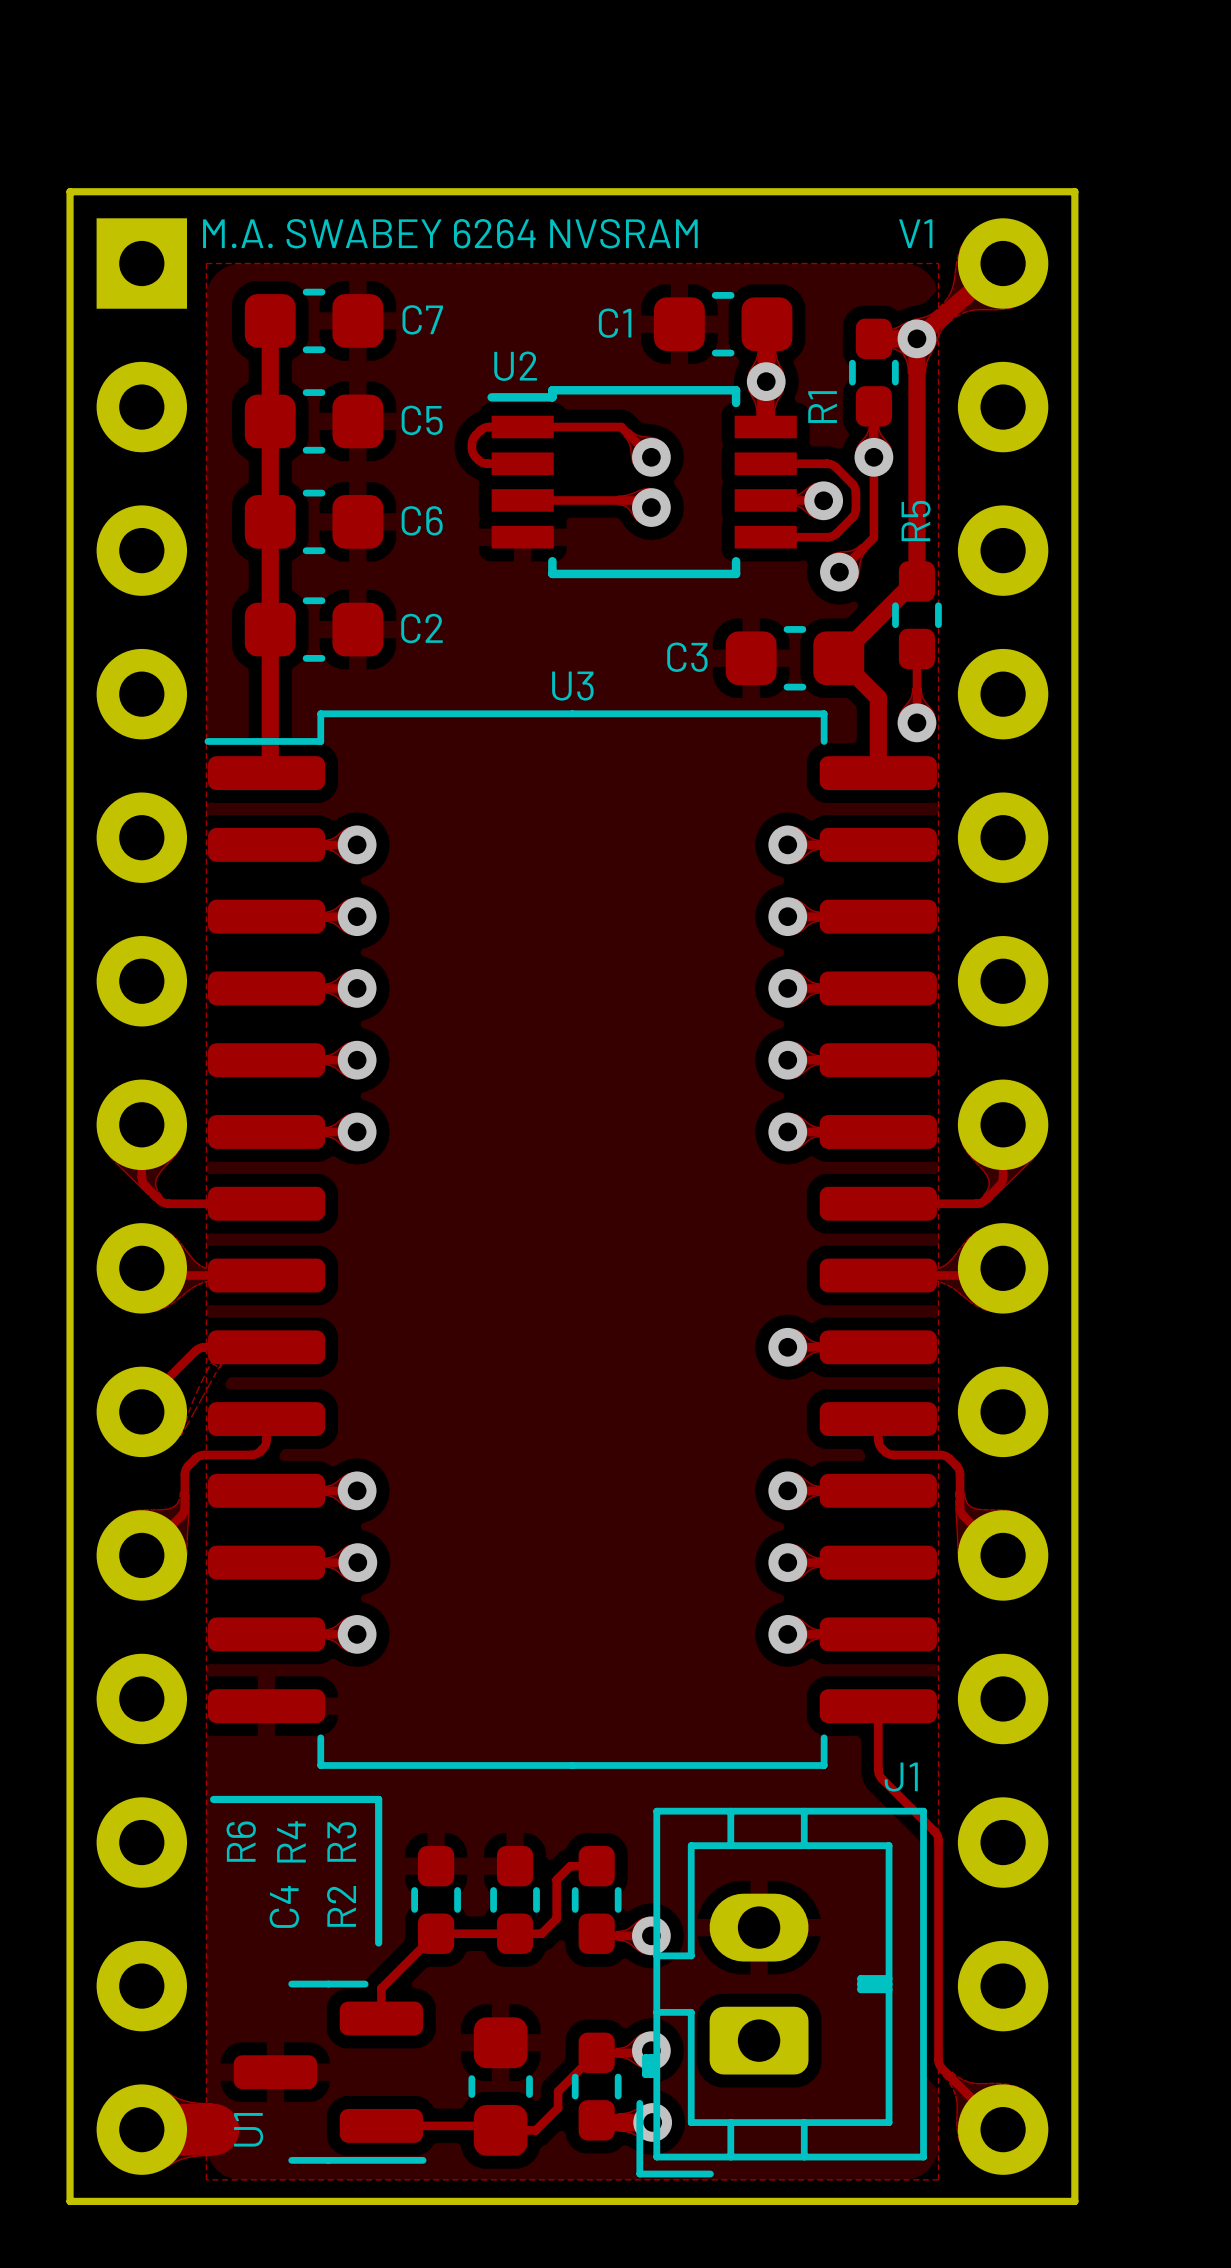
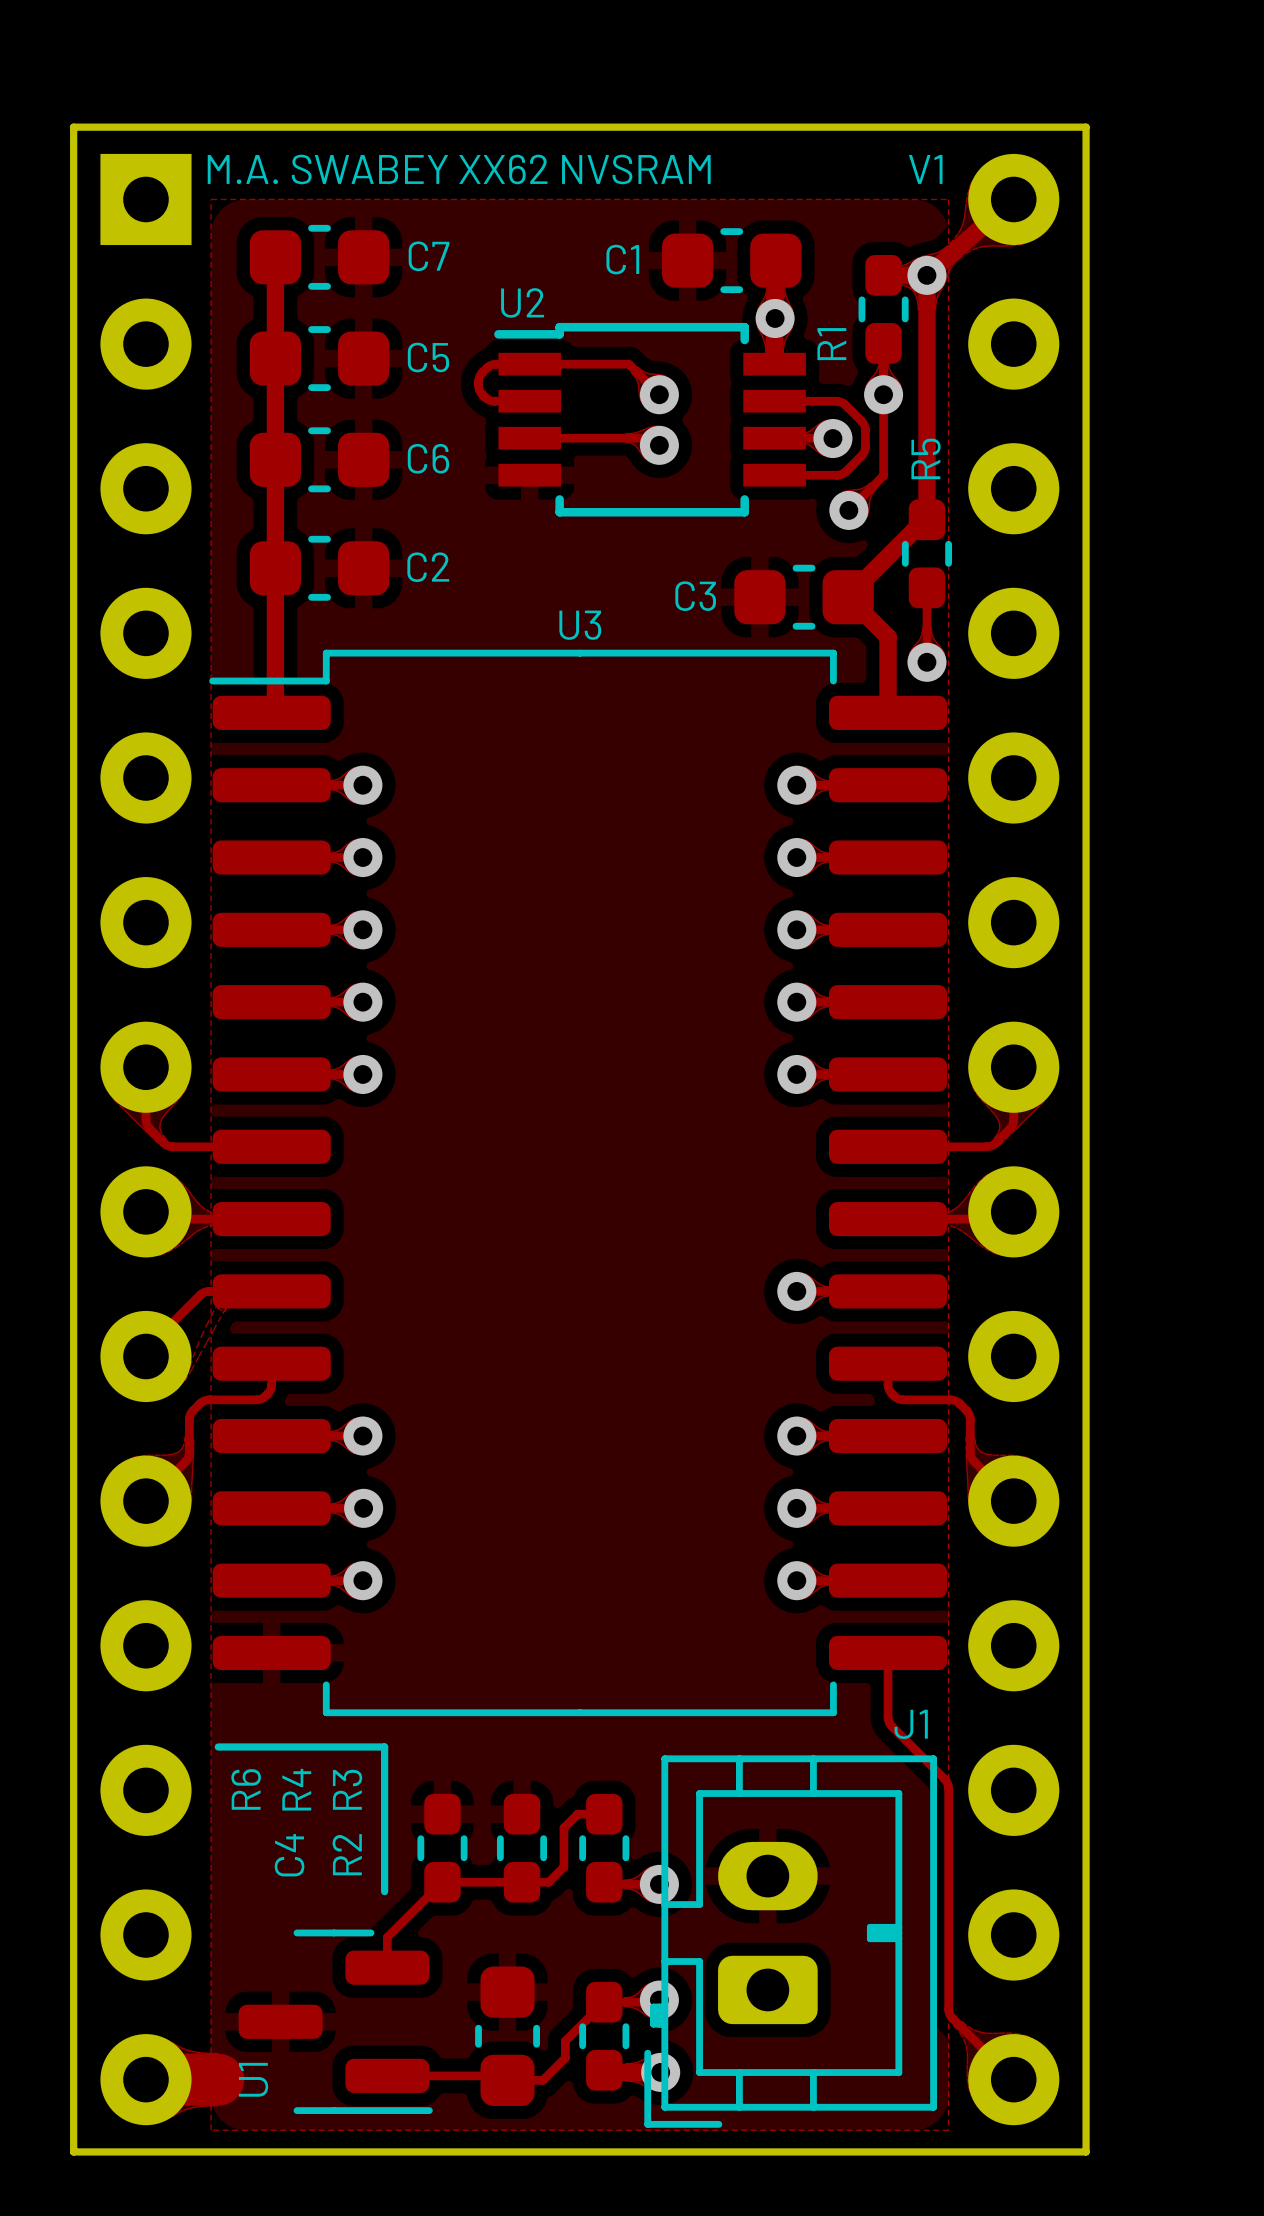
text: M.A. SWABEY 6264 NVSRAM (450, 233) -> M.A. SWABEY XX62 NVSRAM (459, 169)

